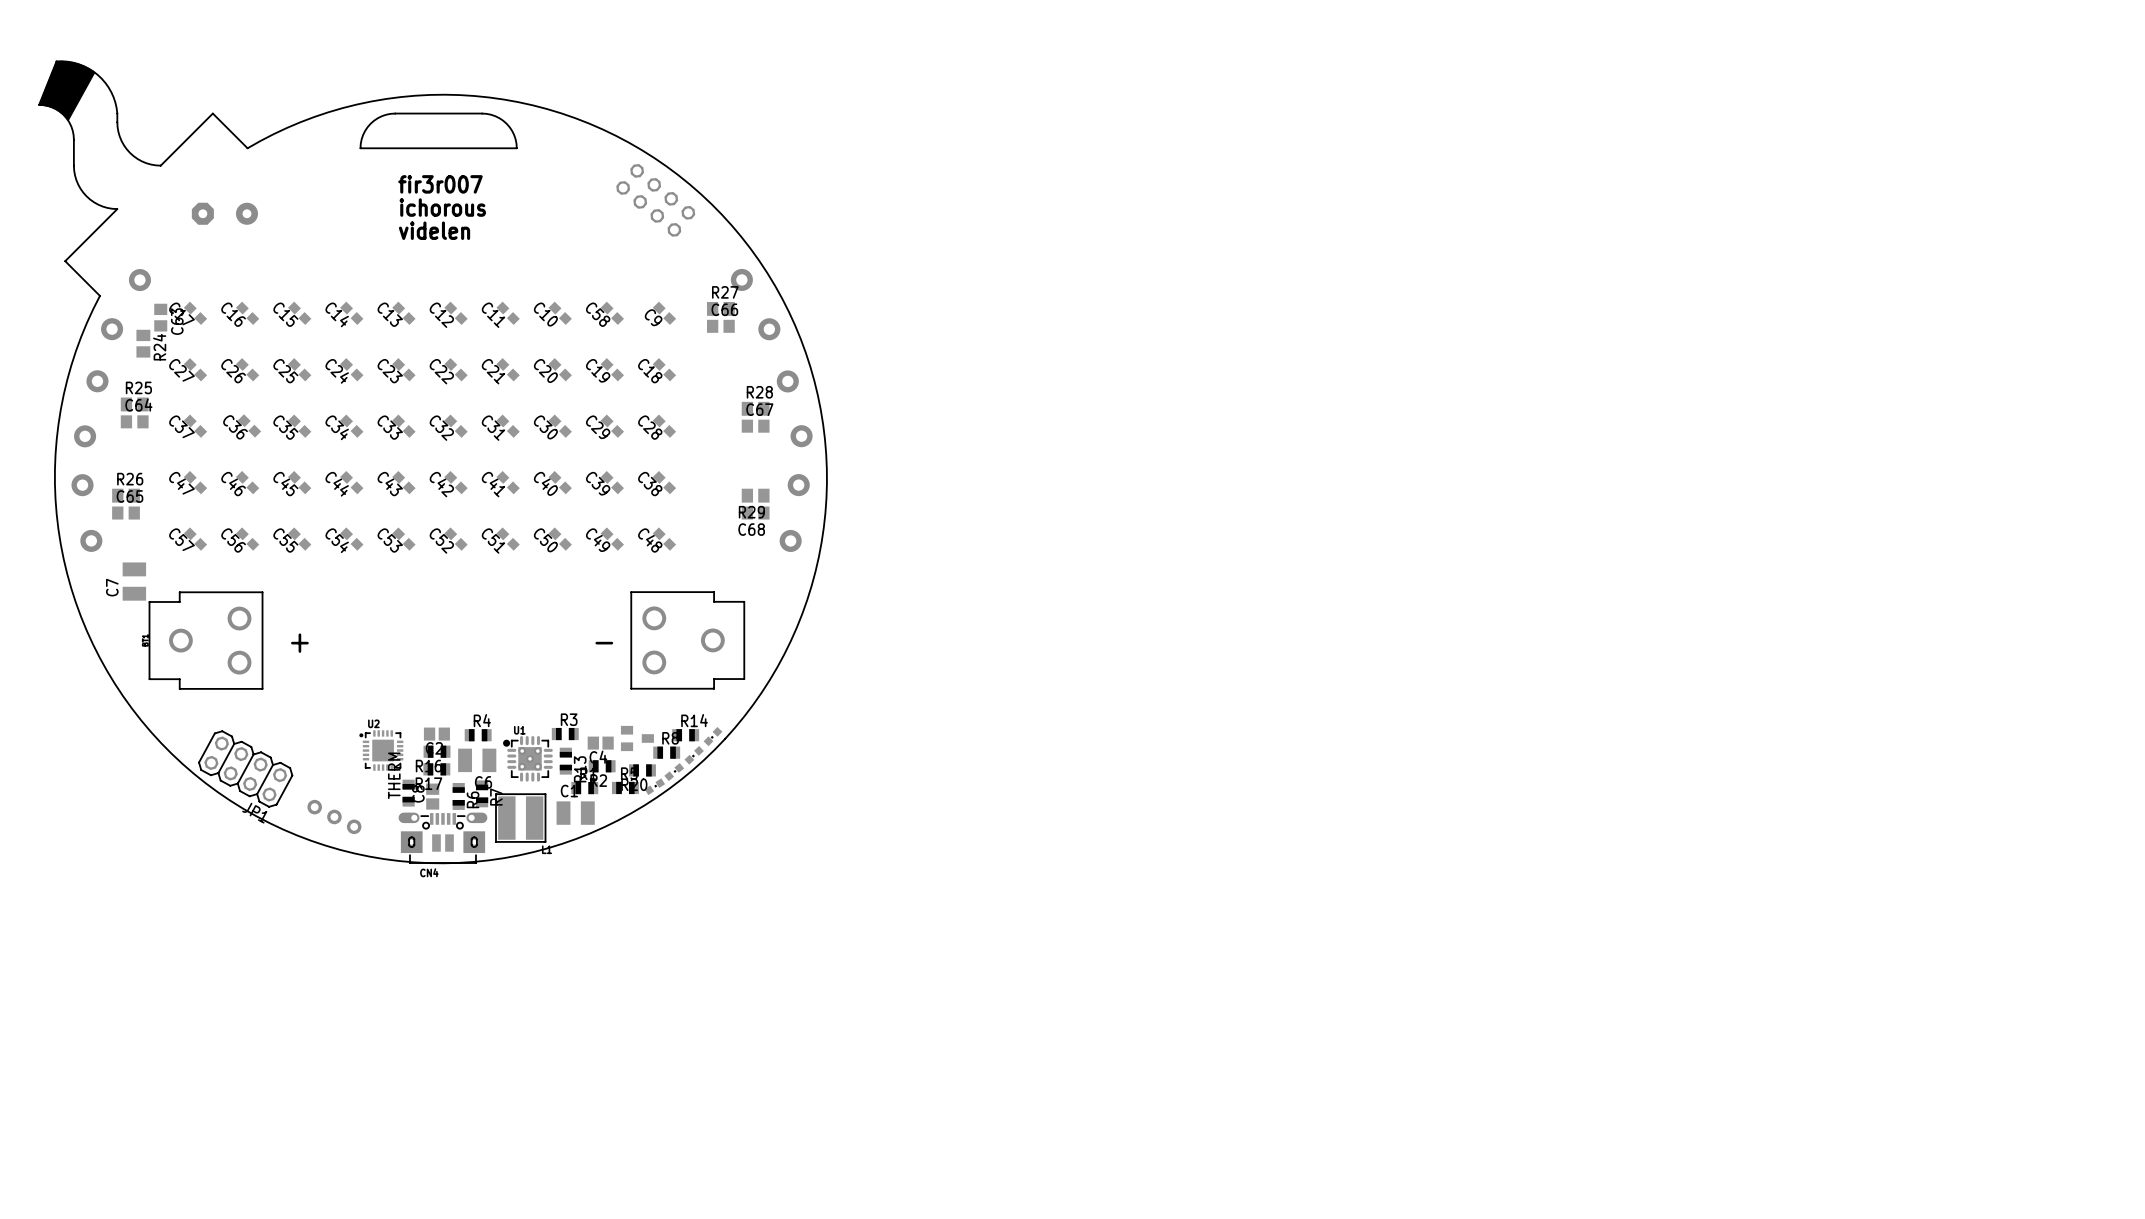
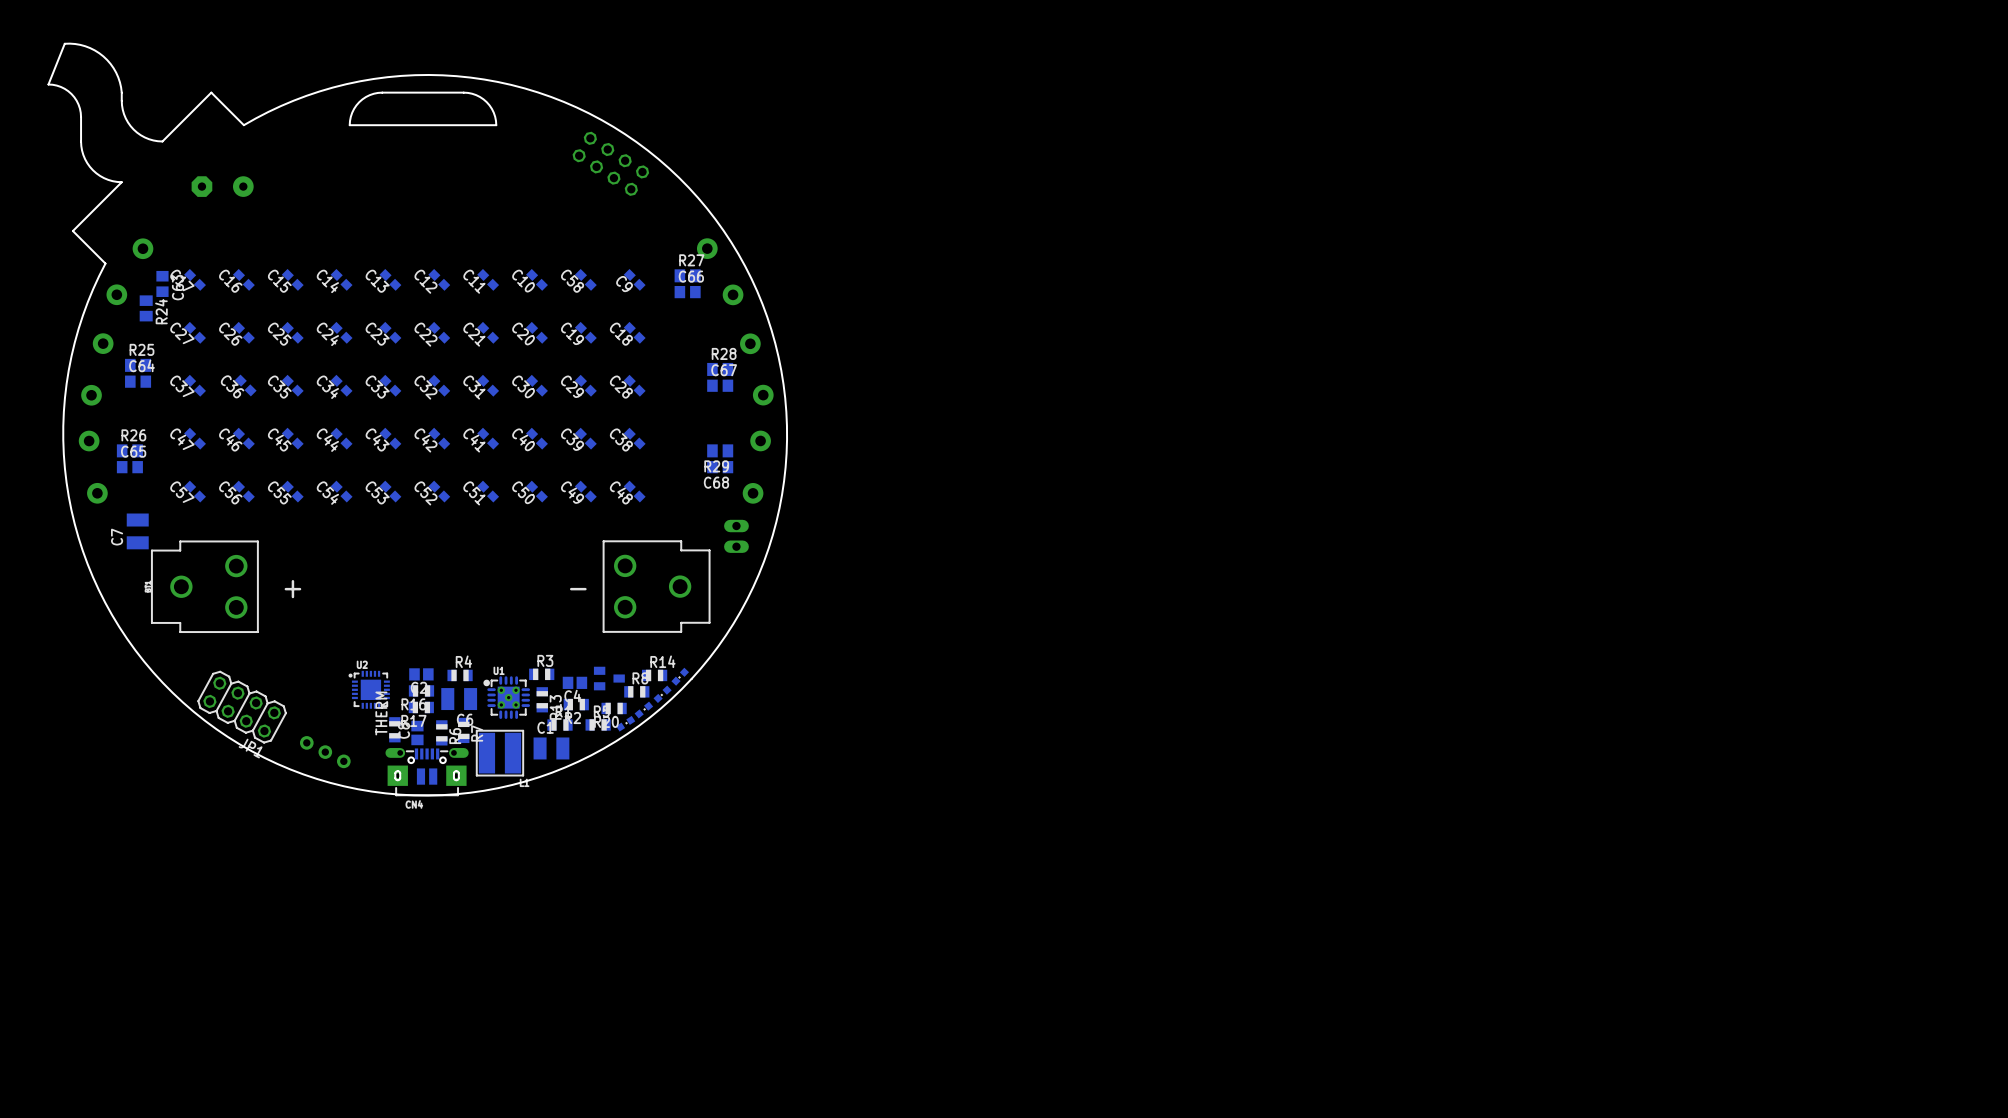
drawing: [38, 60, 96, 122] -> none
text: fir3r007 (440, 184) -> none
part: none -> (610, 163)
part: (655, 200) -> none
text: ichorous (442, 207) -> none
text: videlen (434, 230) -> none
part: none -> (736, 536)

